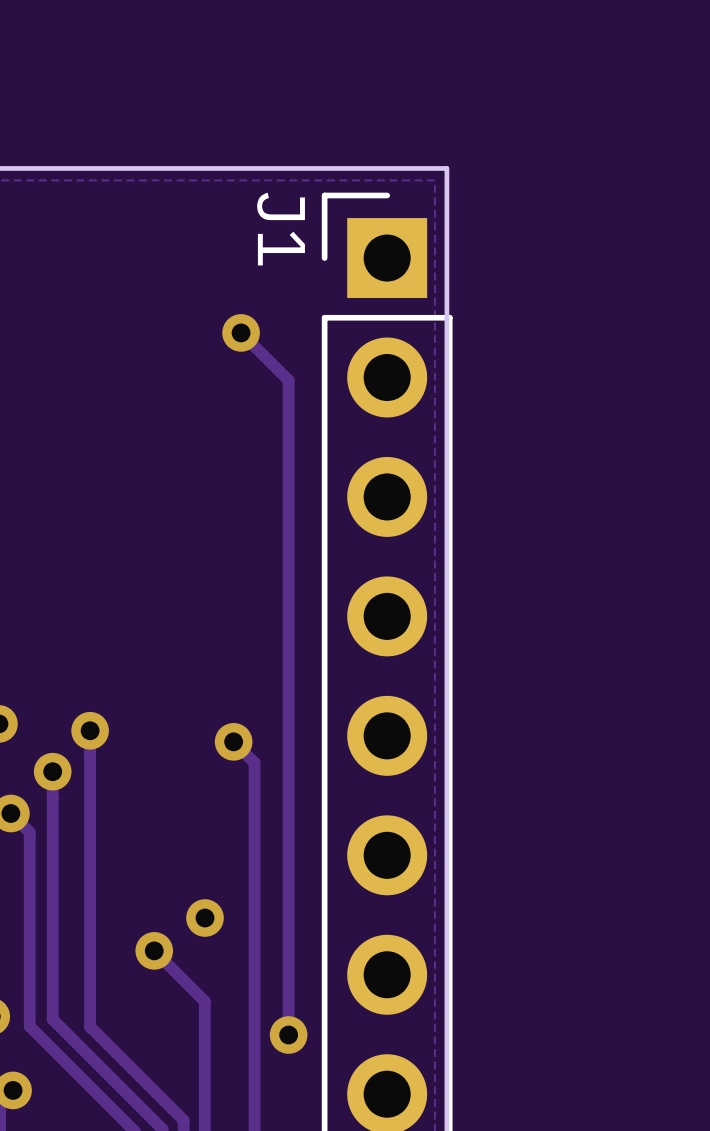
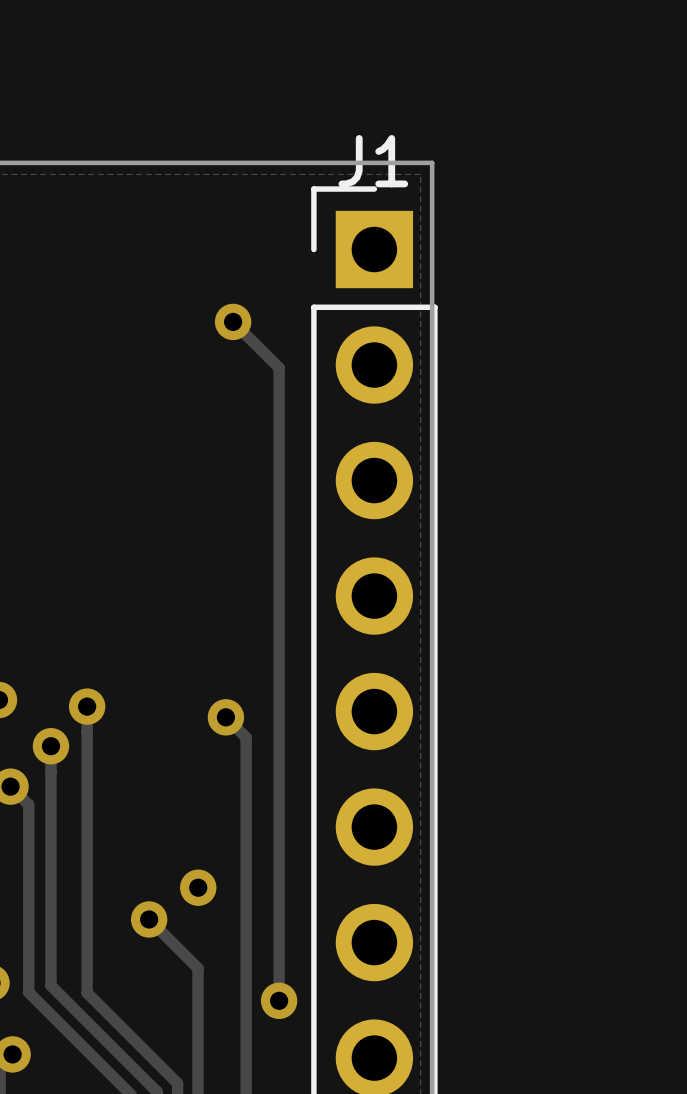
J1 name rotation: 0° (281, 229) -> 90° counterclockwise (373, 161)
J1 name position: J1 (281, 229) -> J1 (373, 161)

